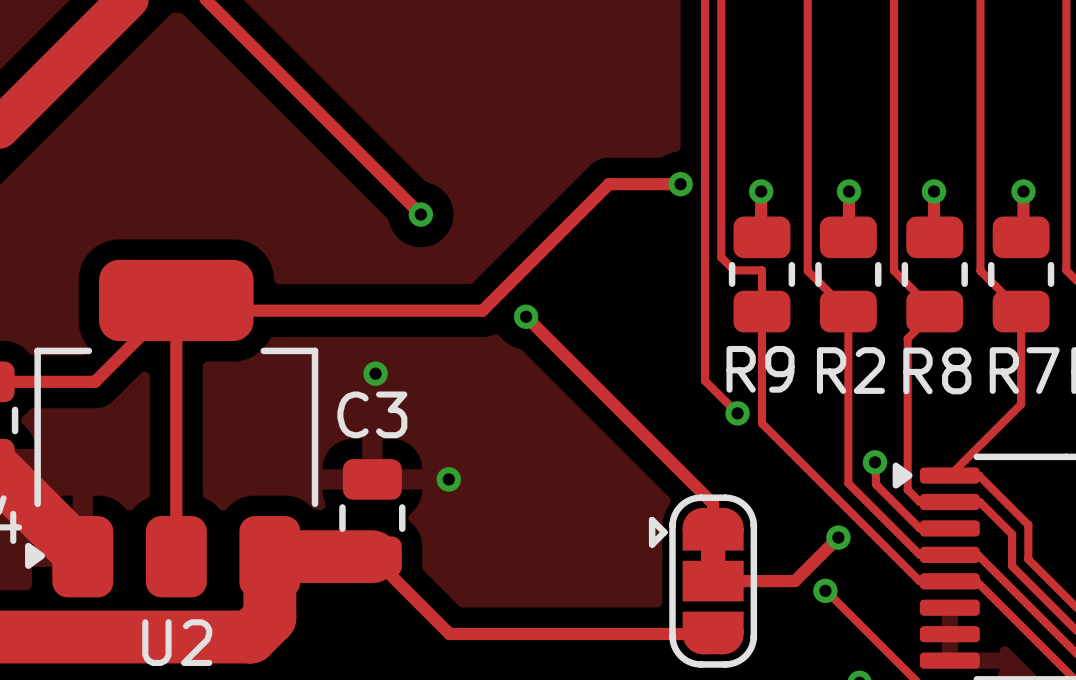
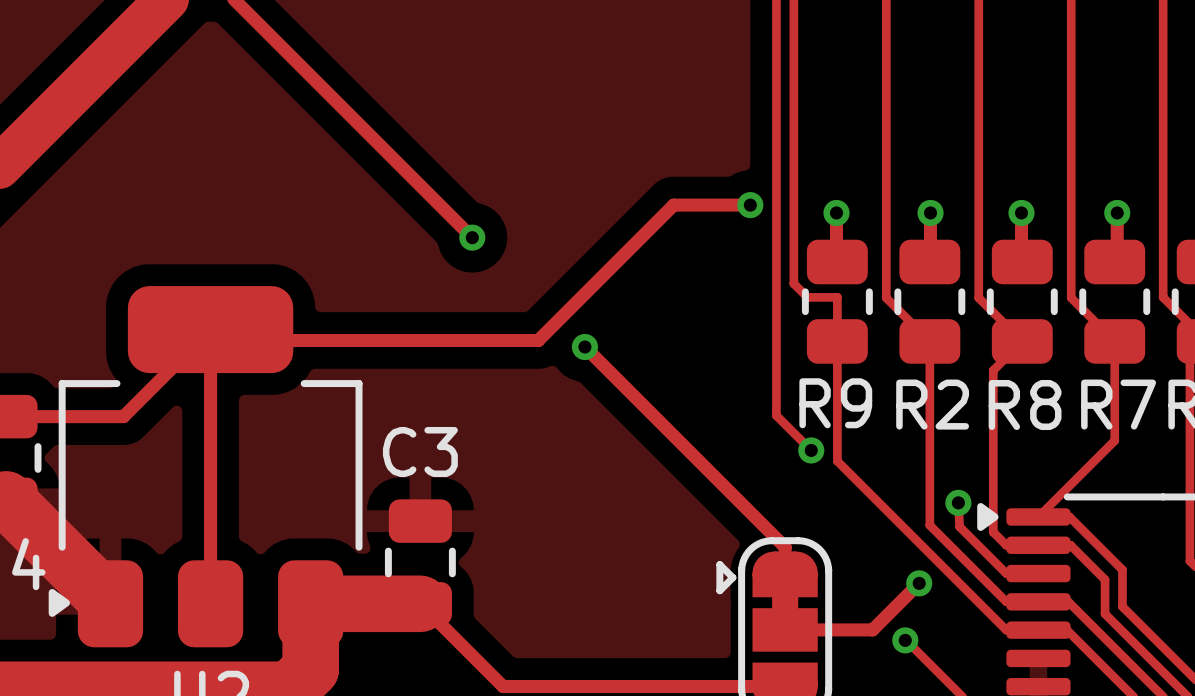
via: (375, 373) -> none
via: (448, 479) -> none

